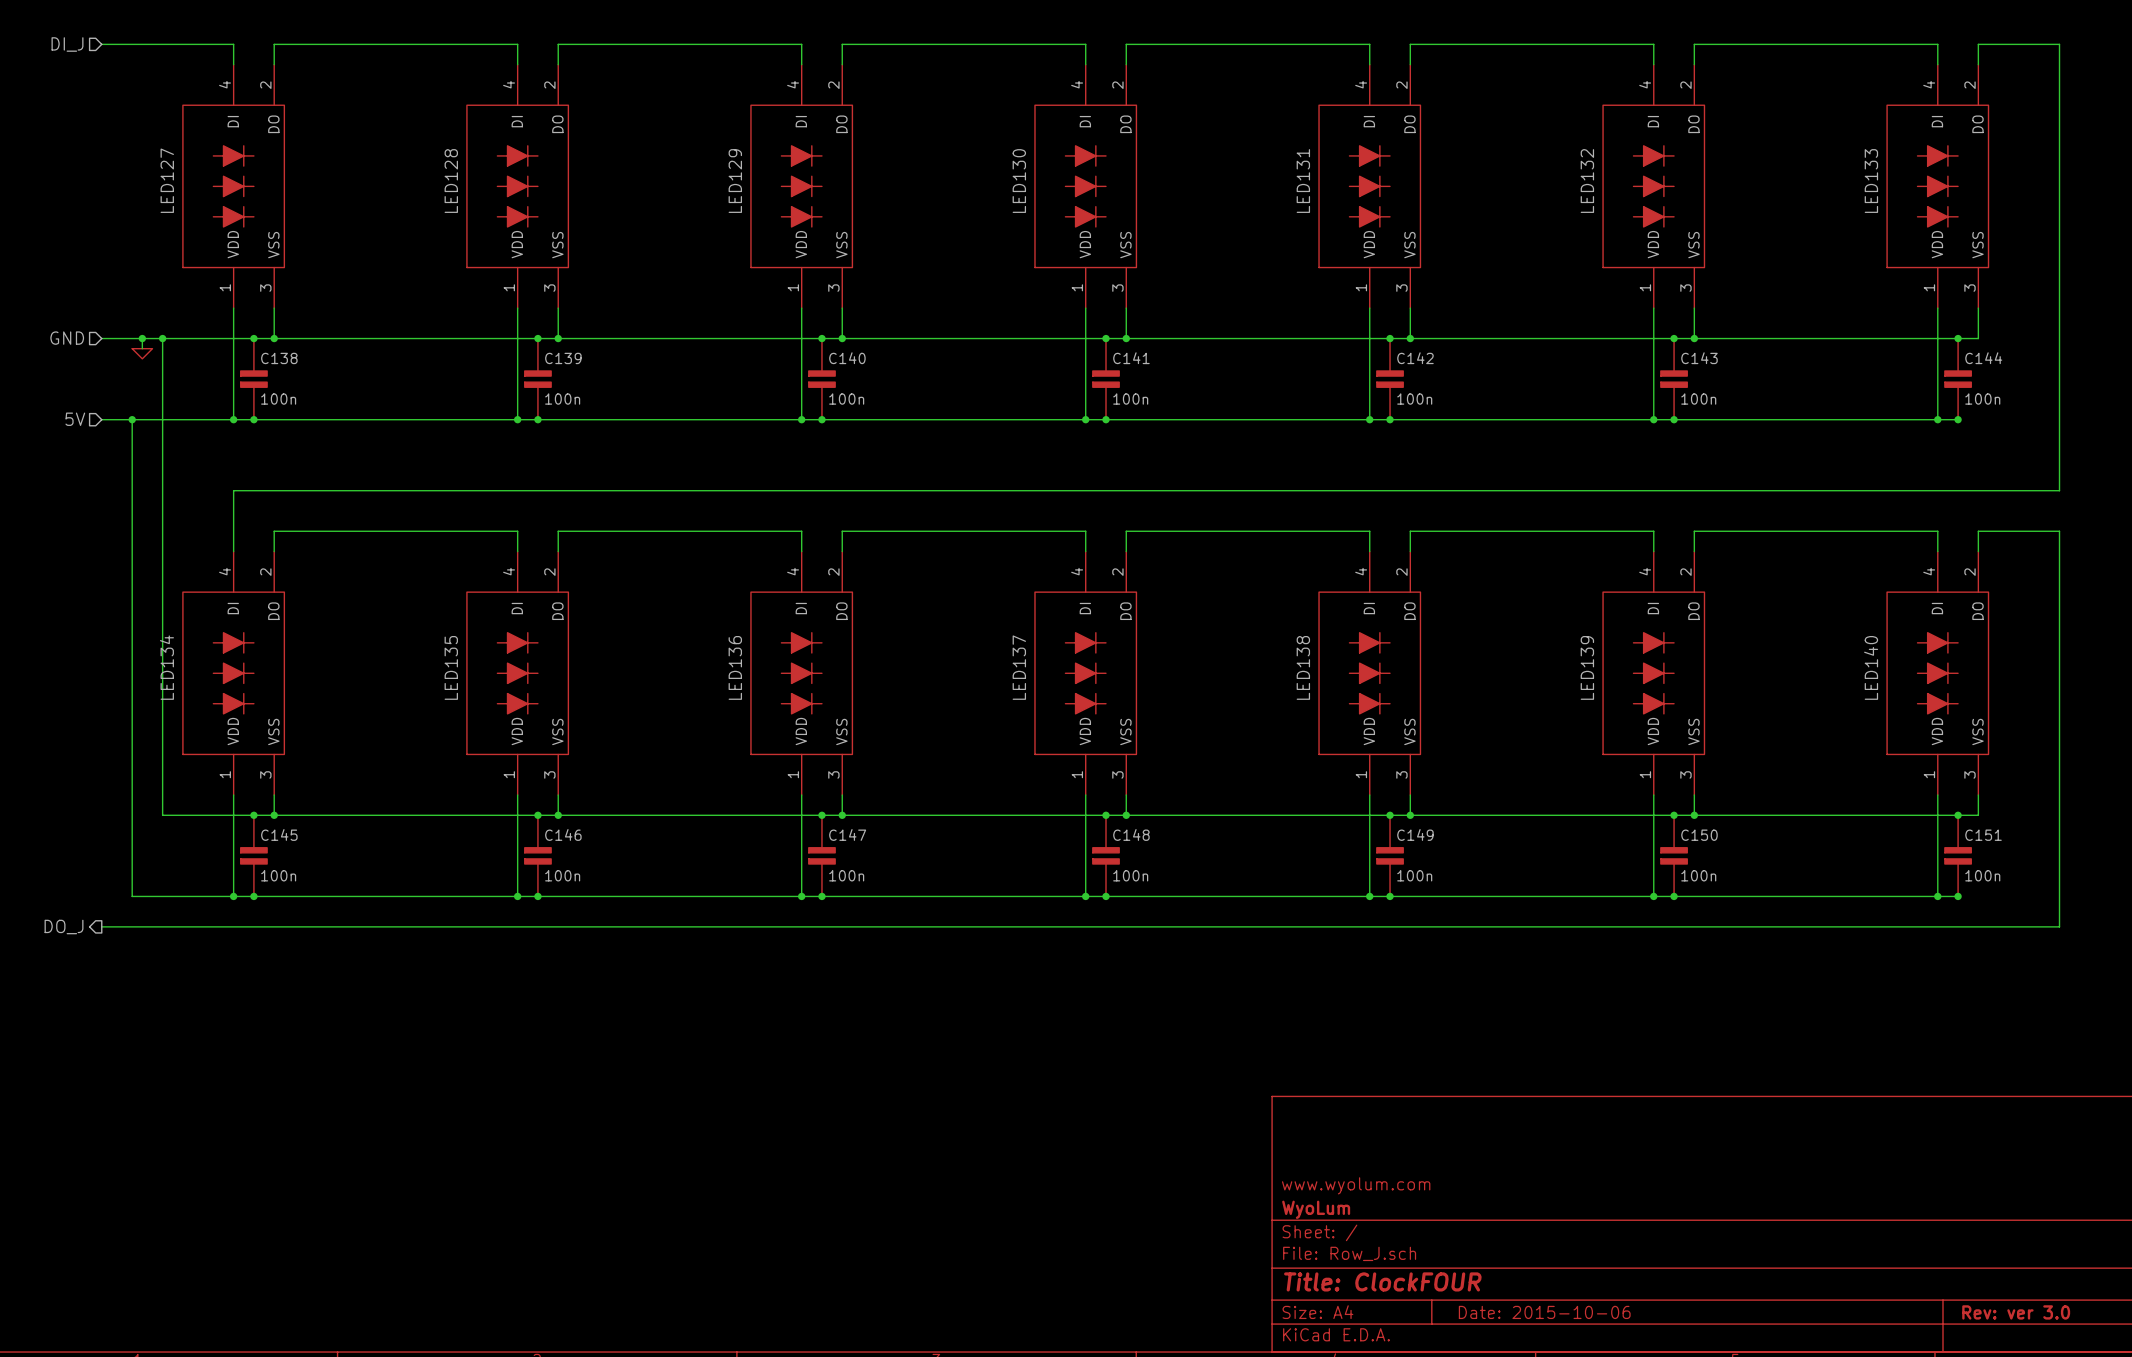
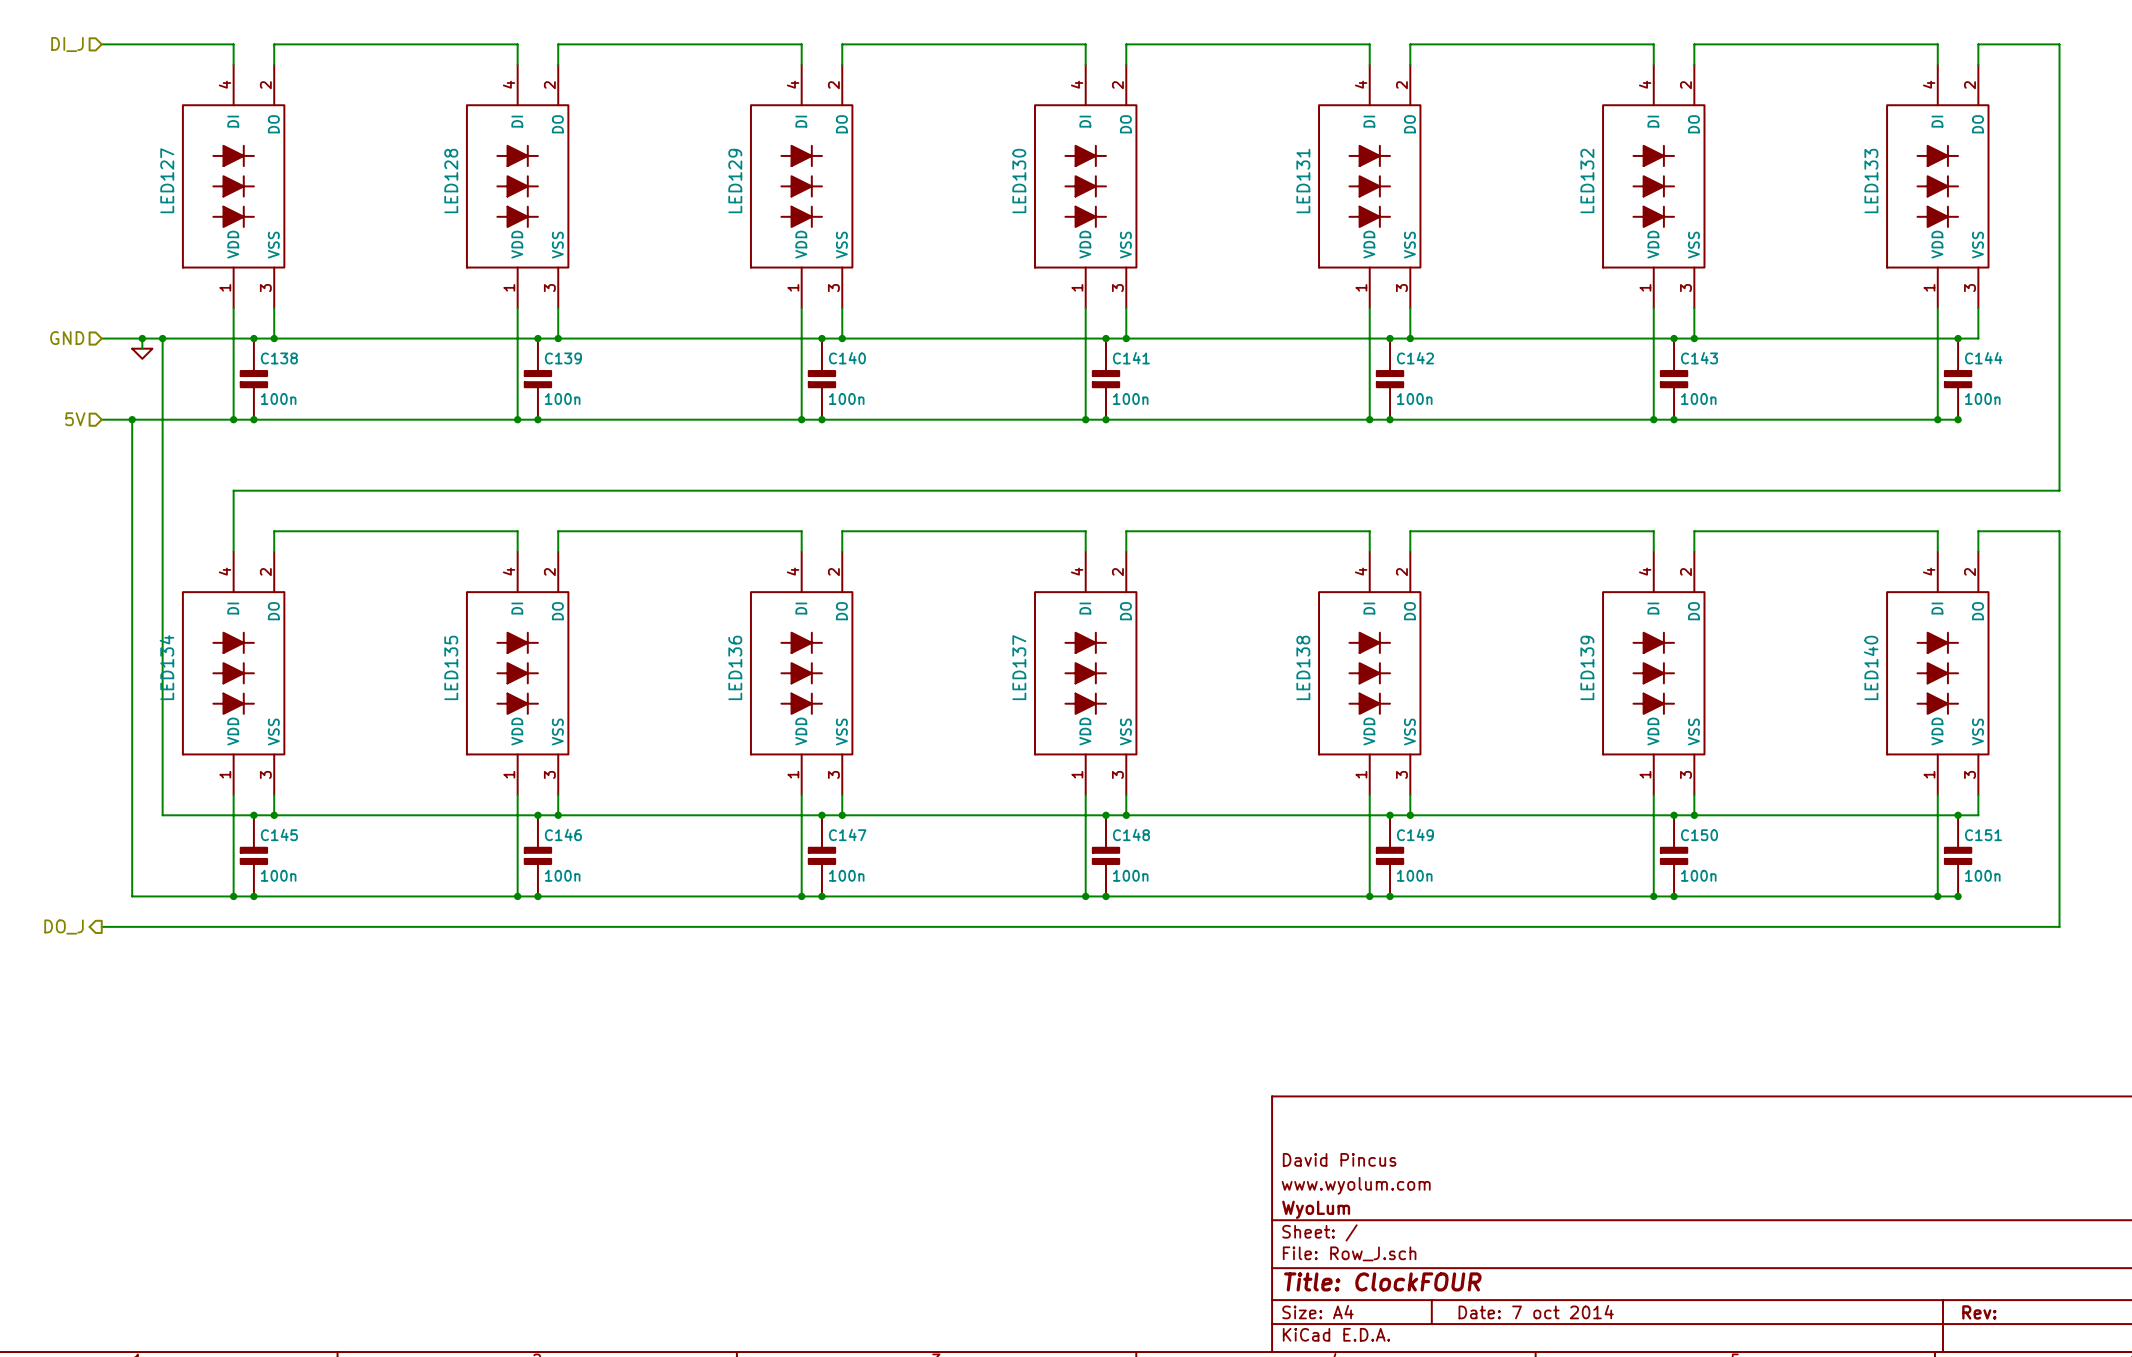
title block: none -> David Pincus (1339, 1159)
title block: Date: 2015-10-06 (1544, 1312) -> Date: 7 oct 2014 (1536, 1312)
title block: Rev: ver 3.0 (2016, 1312) -> Rev: (1979, 1312)

